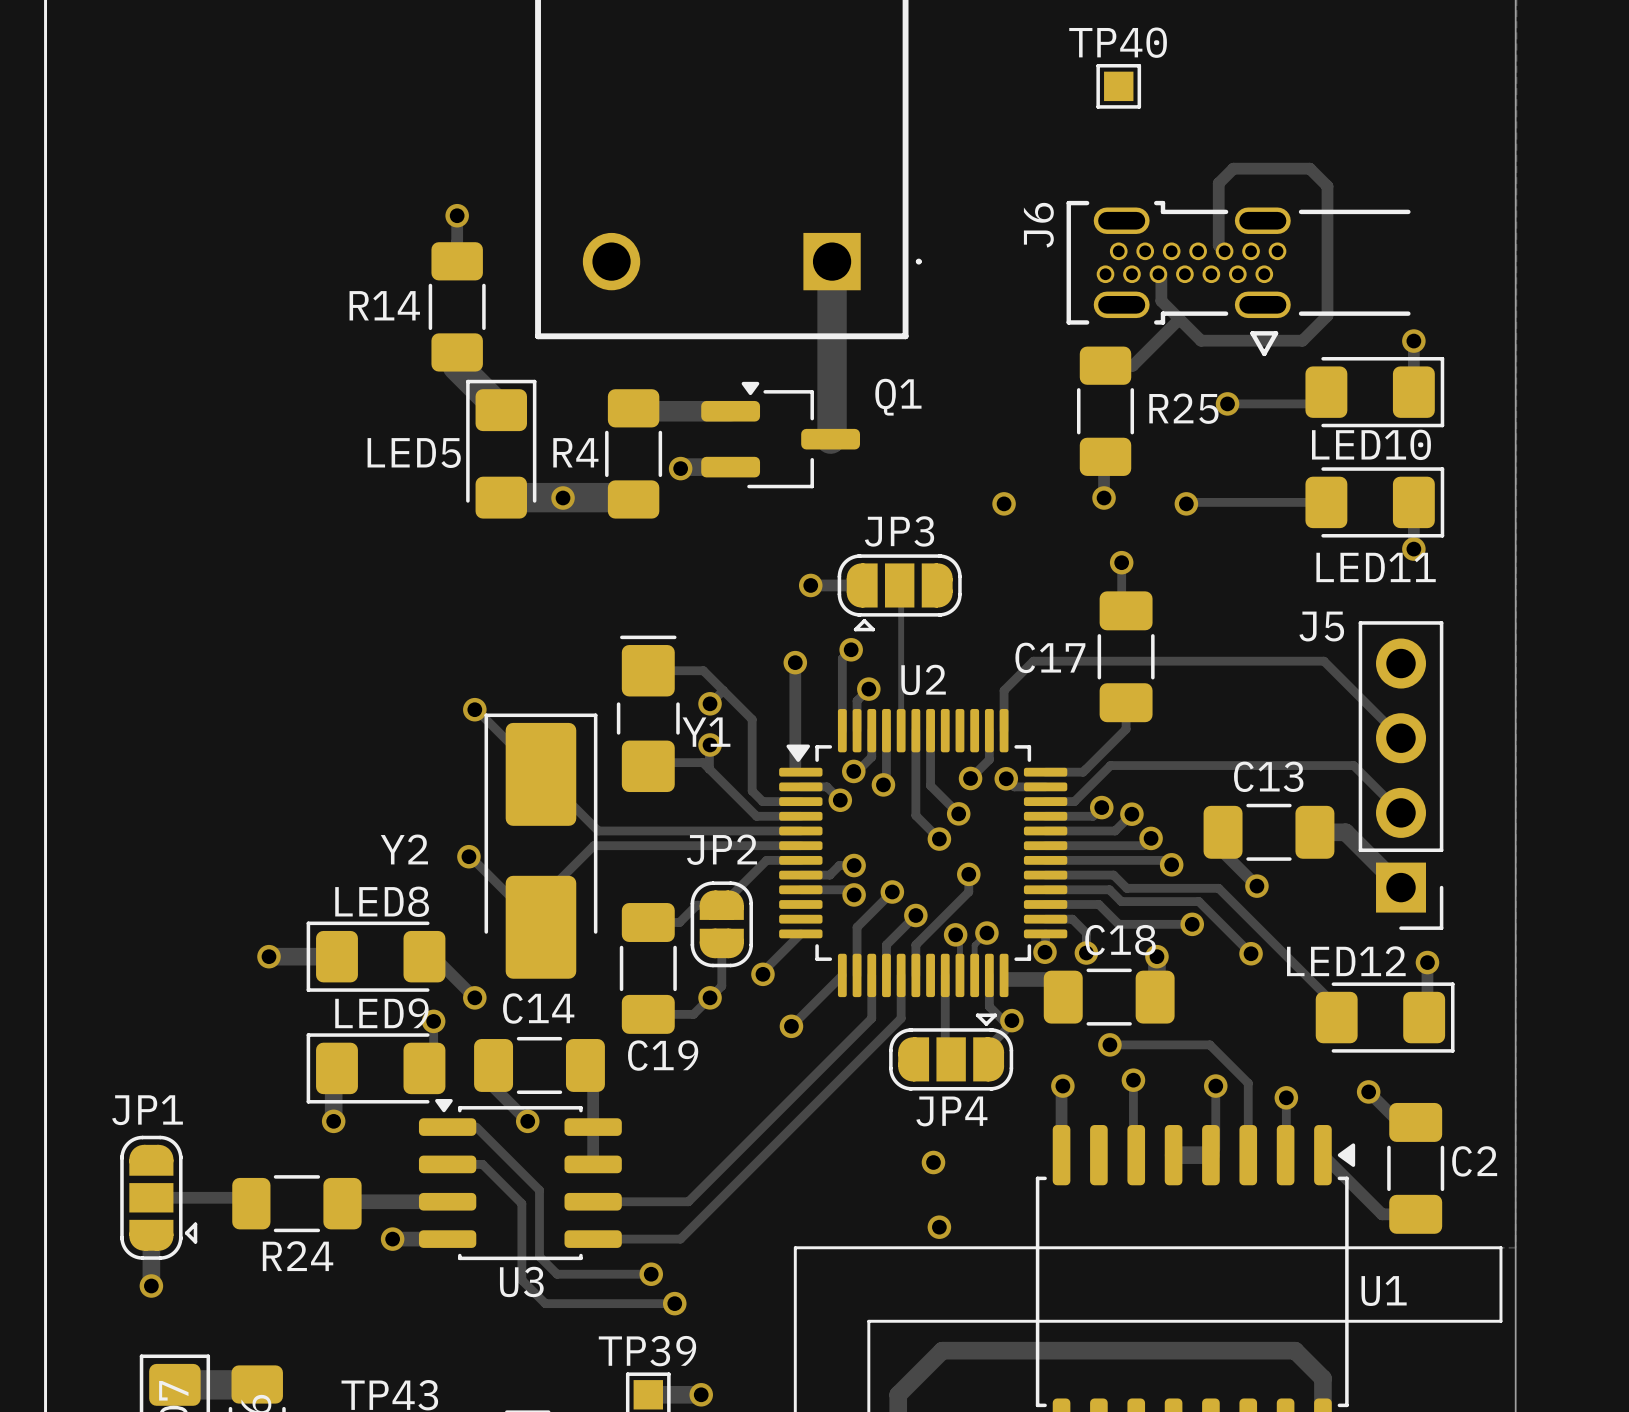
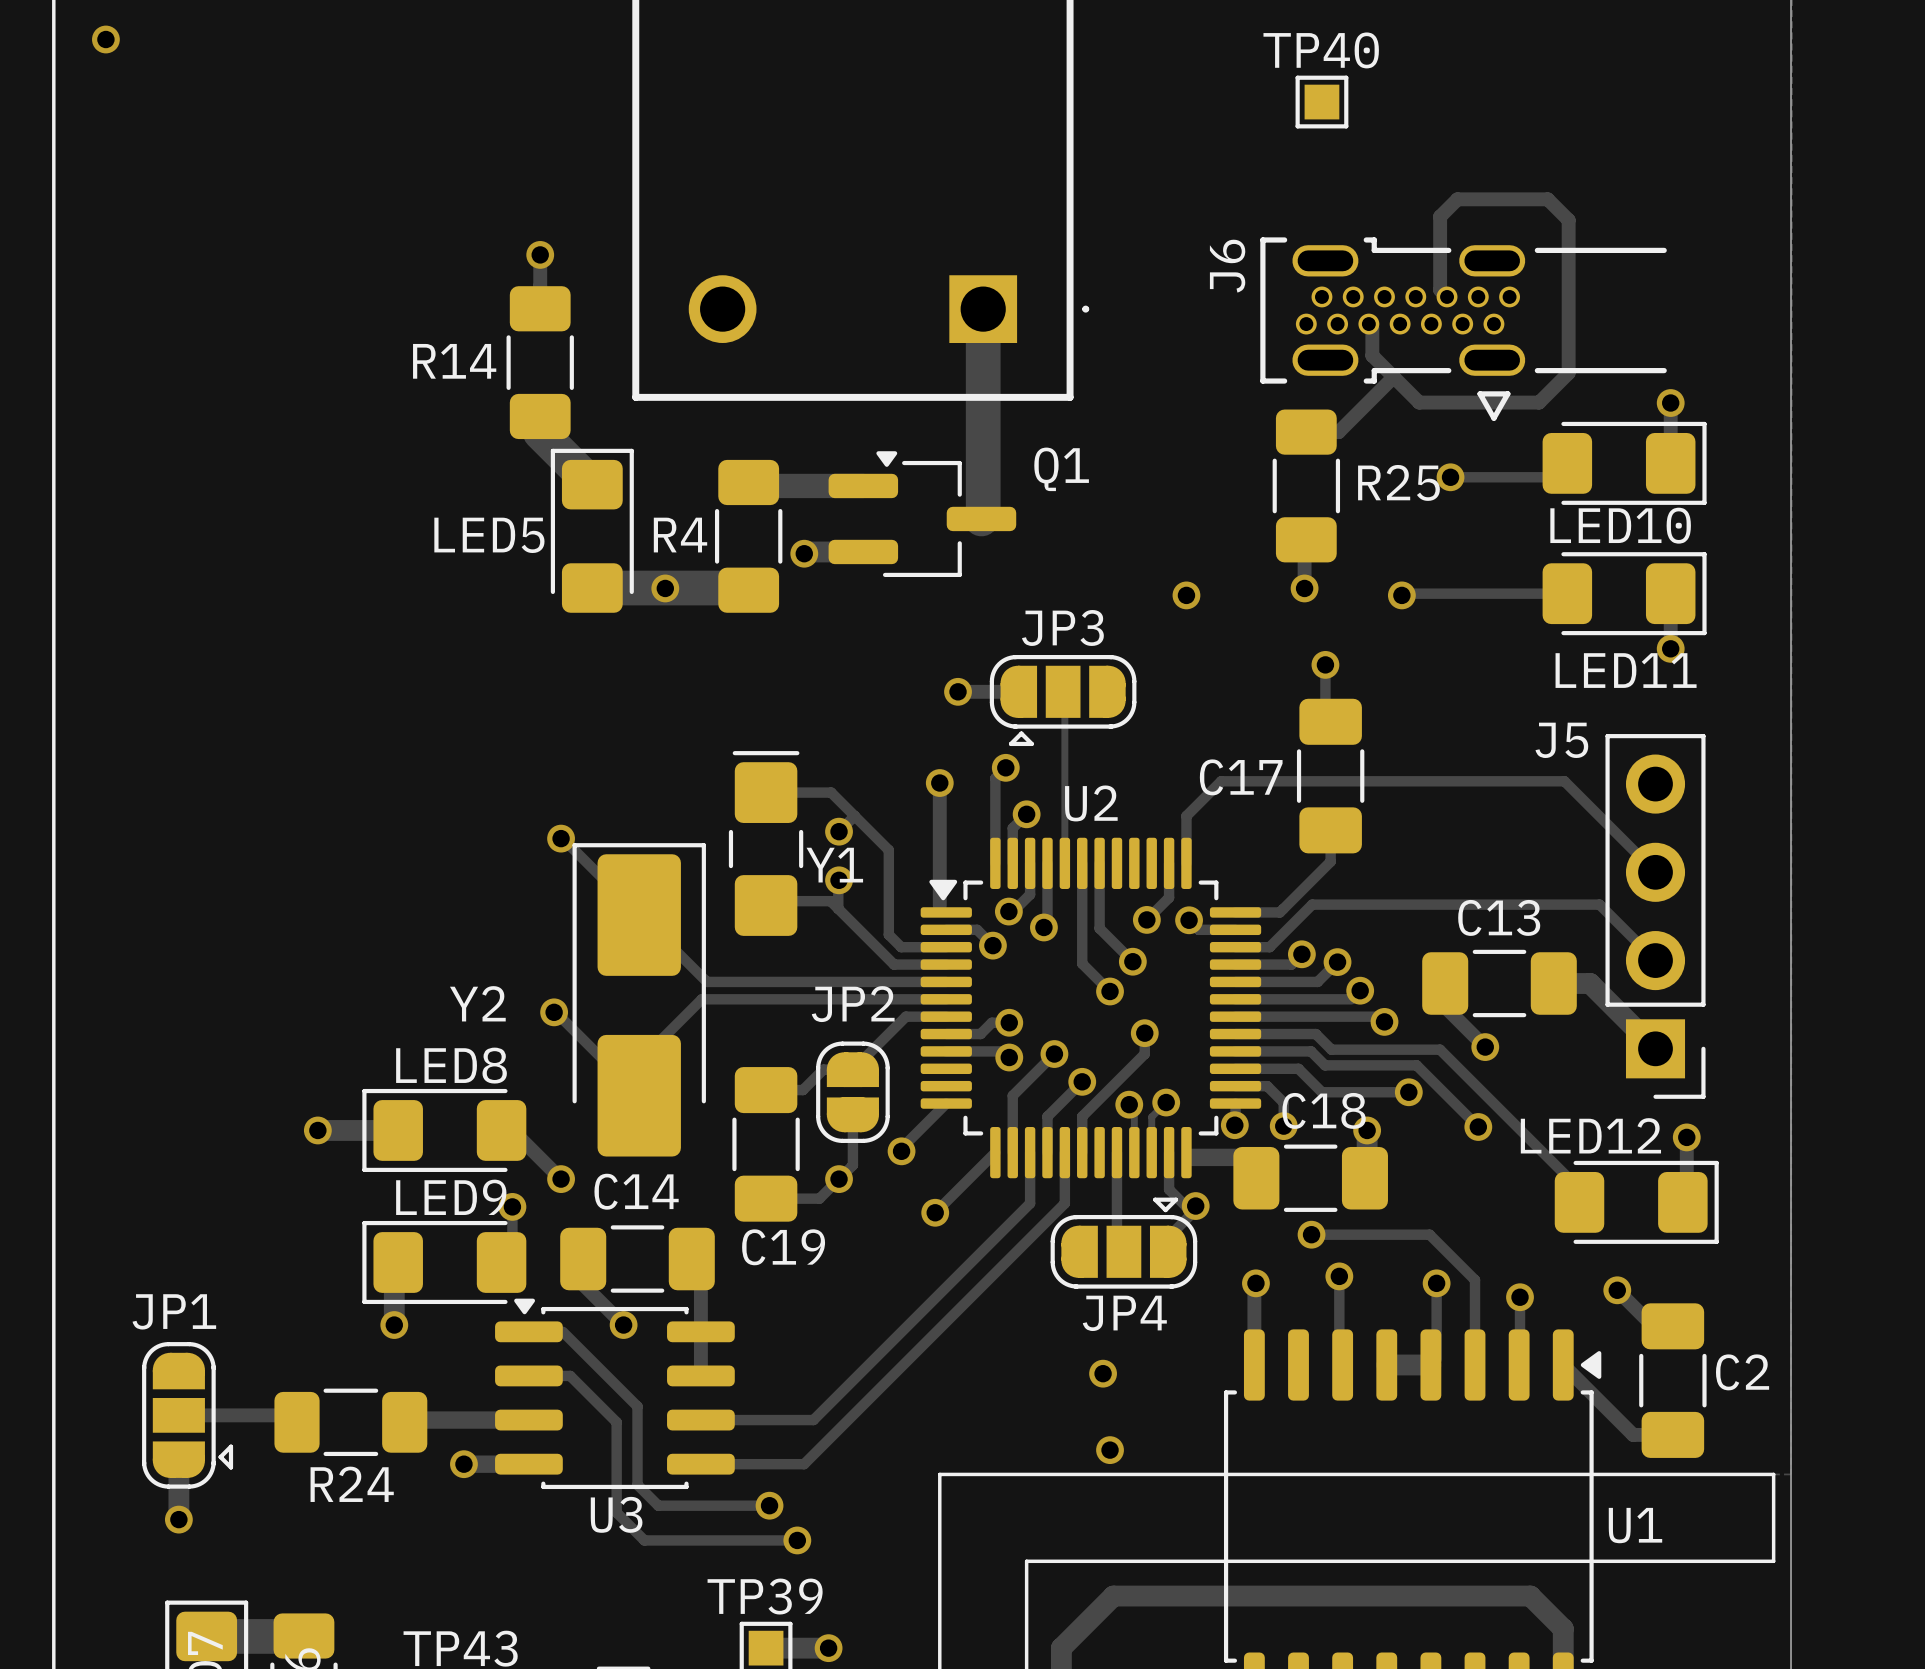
via: none -> (105, 39)

